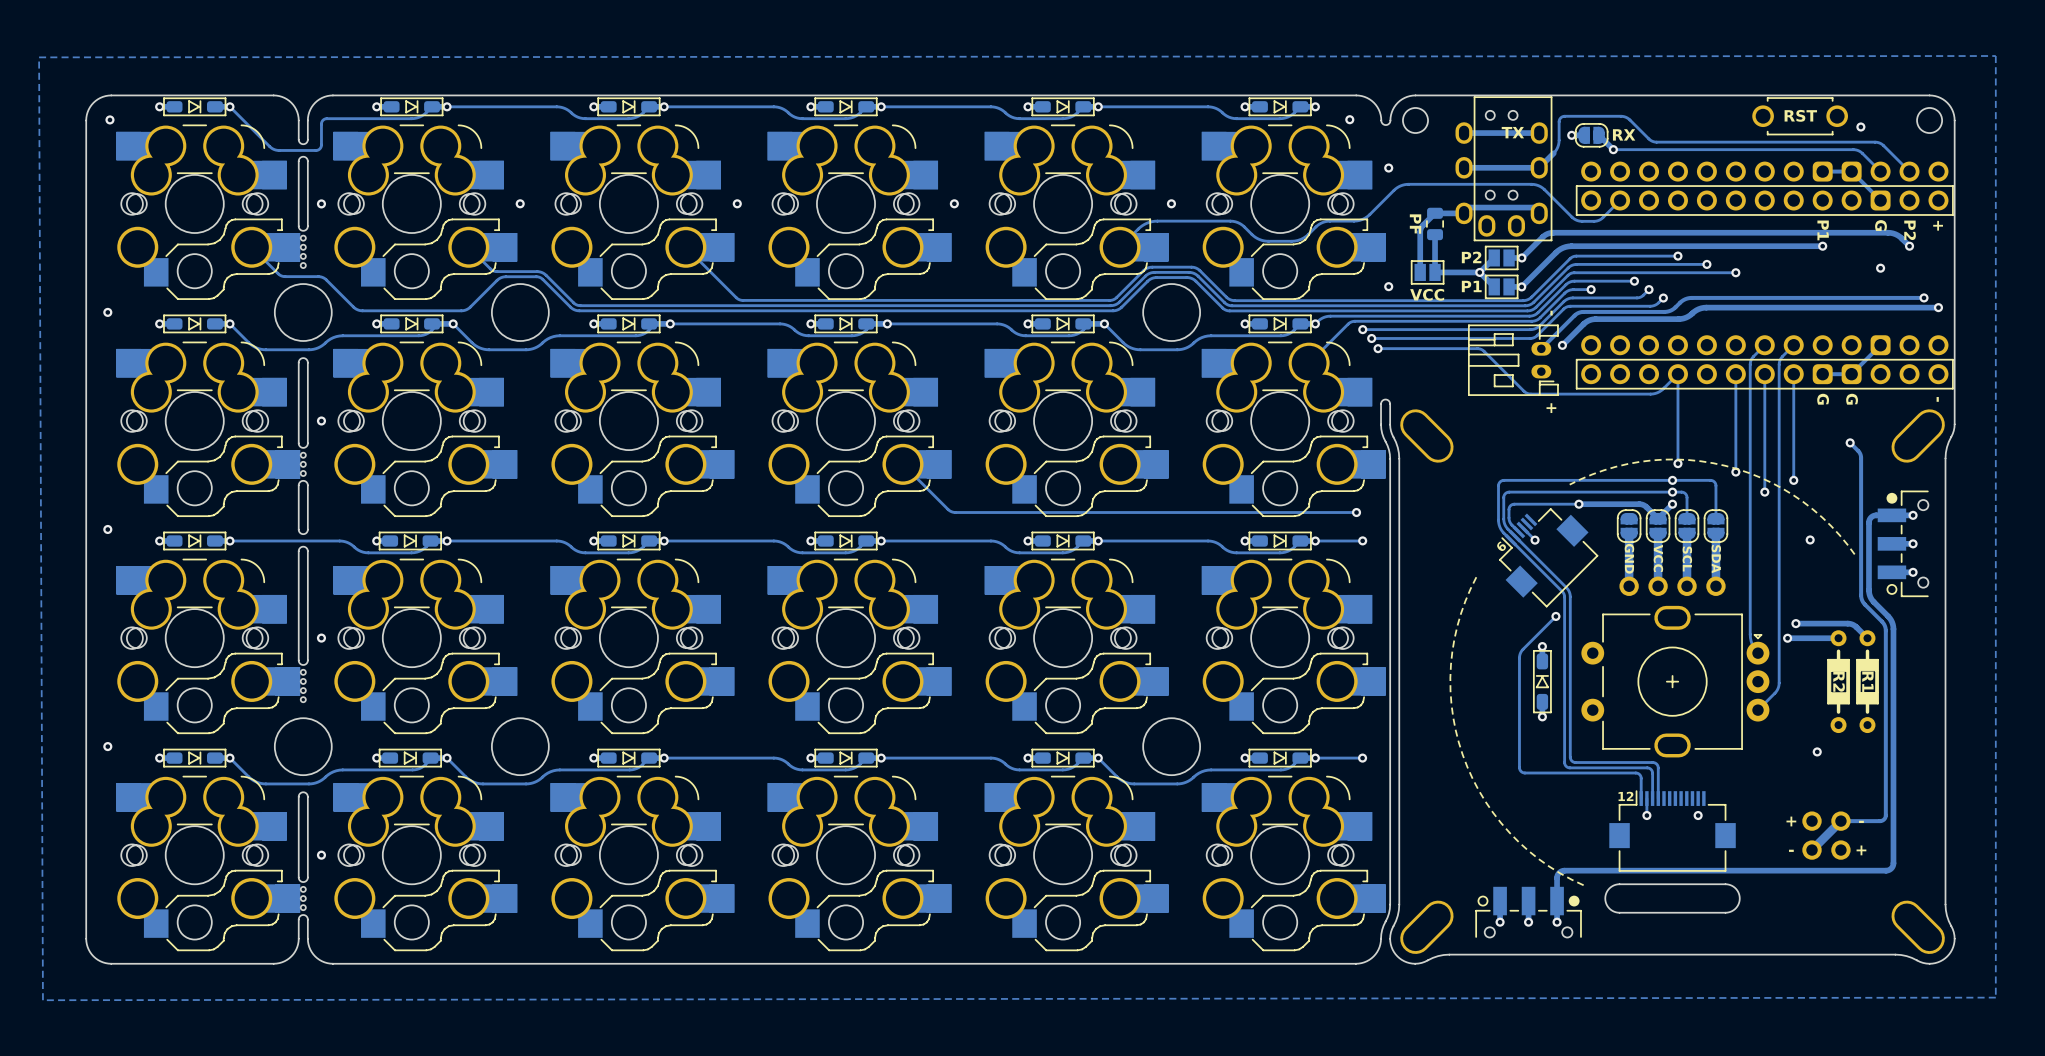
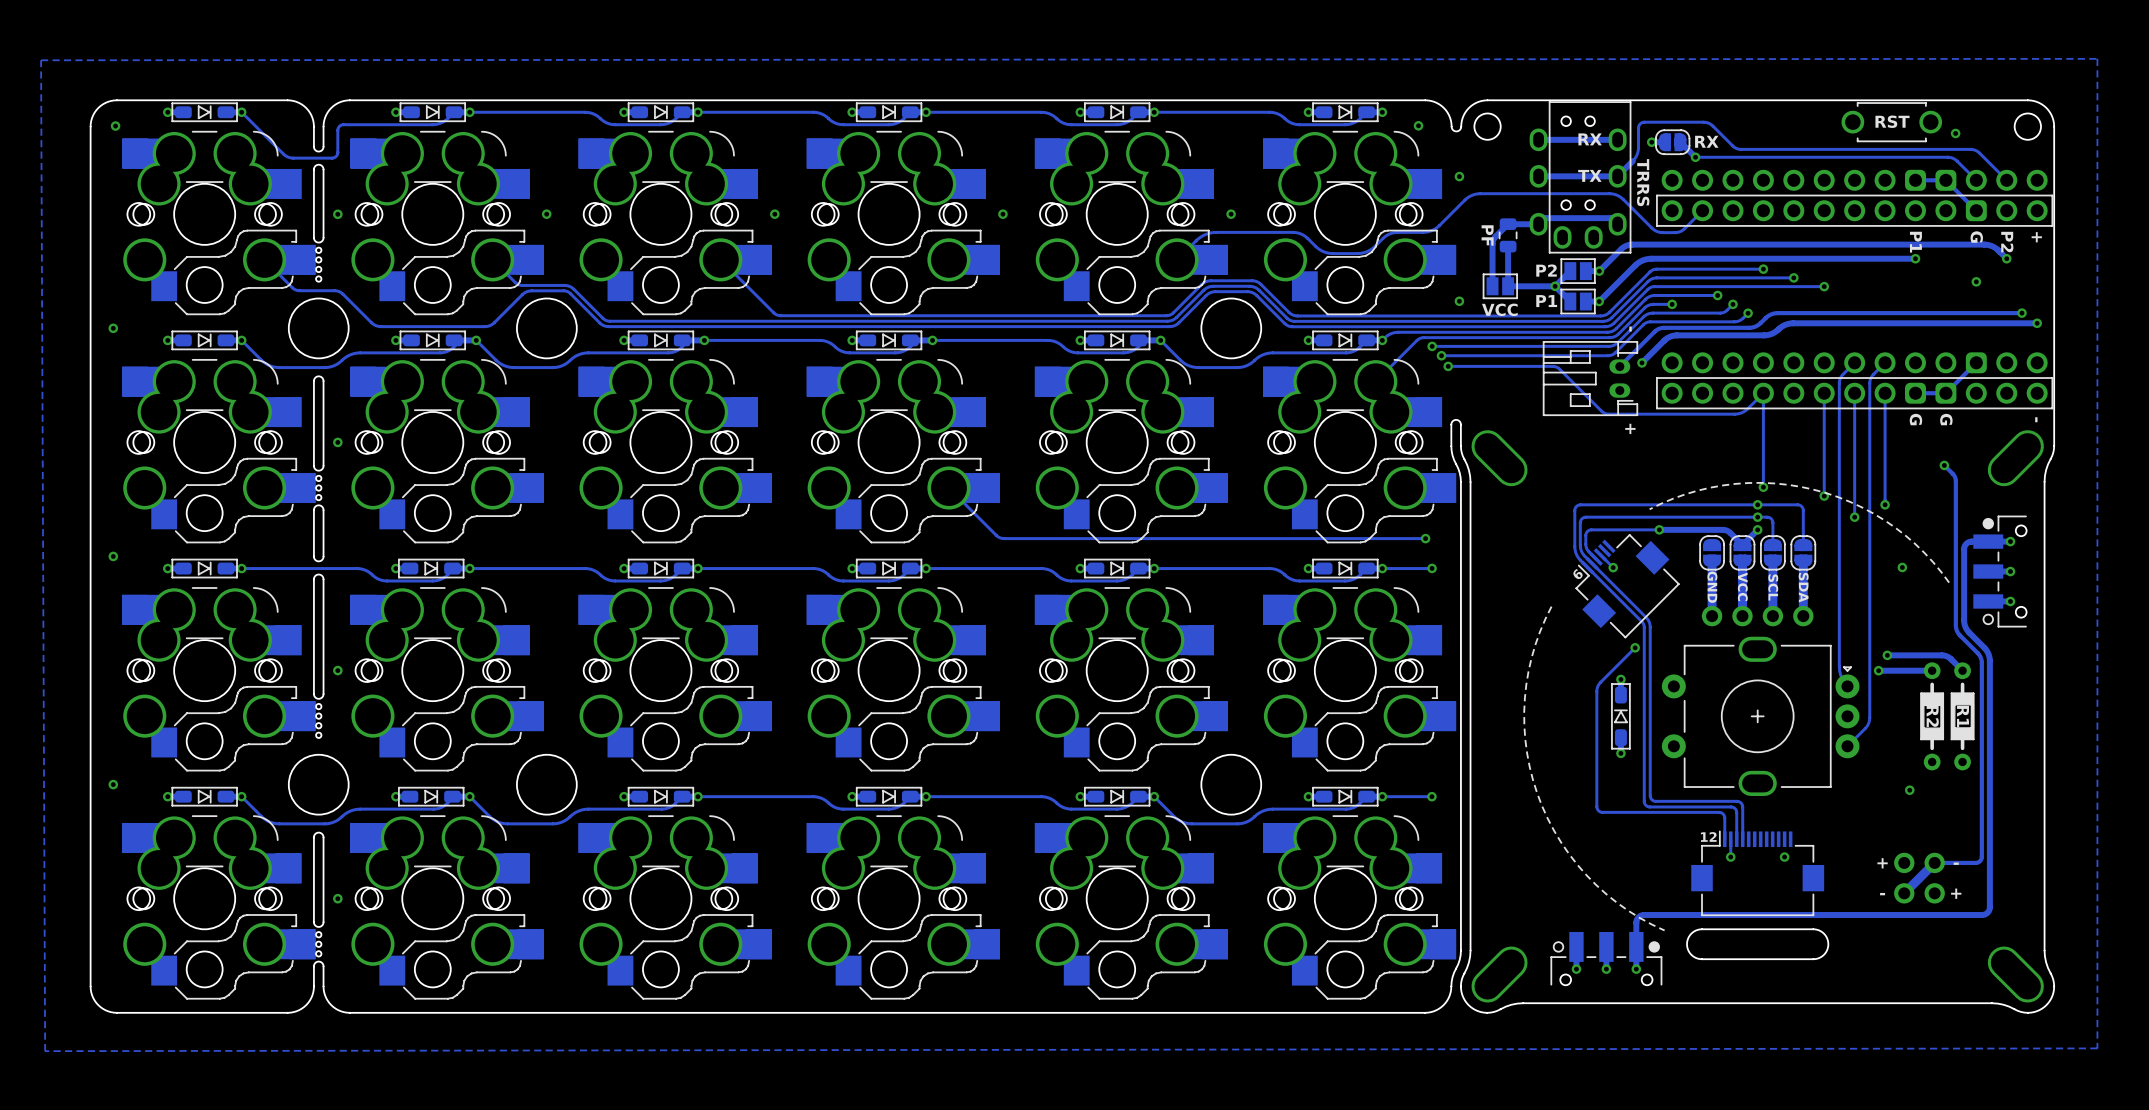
part text position: TX (1512, 132) -> TX (1589, 175)
part text: none -> RX (1590, 139)
part text: none -> TRRS (1643, 182)

